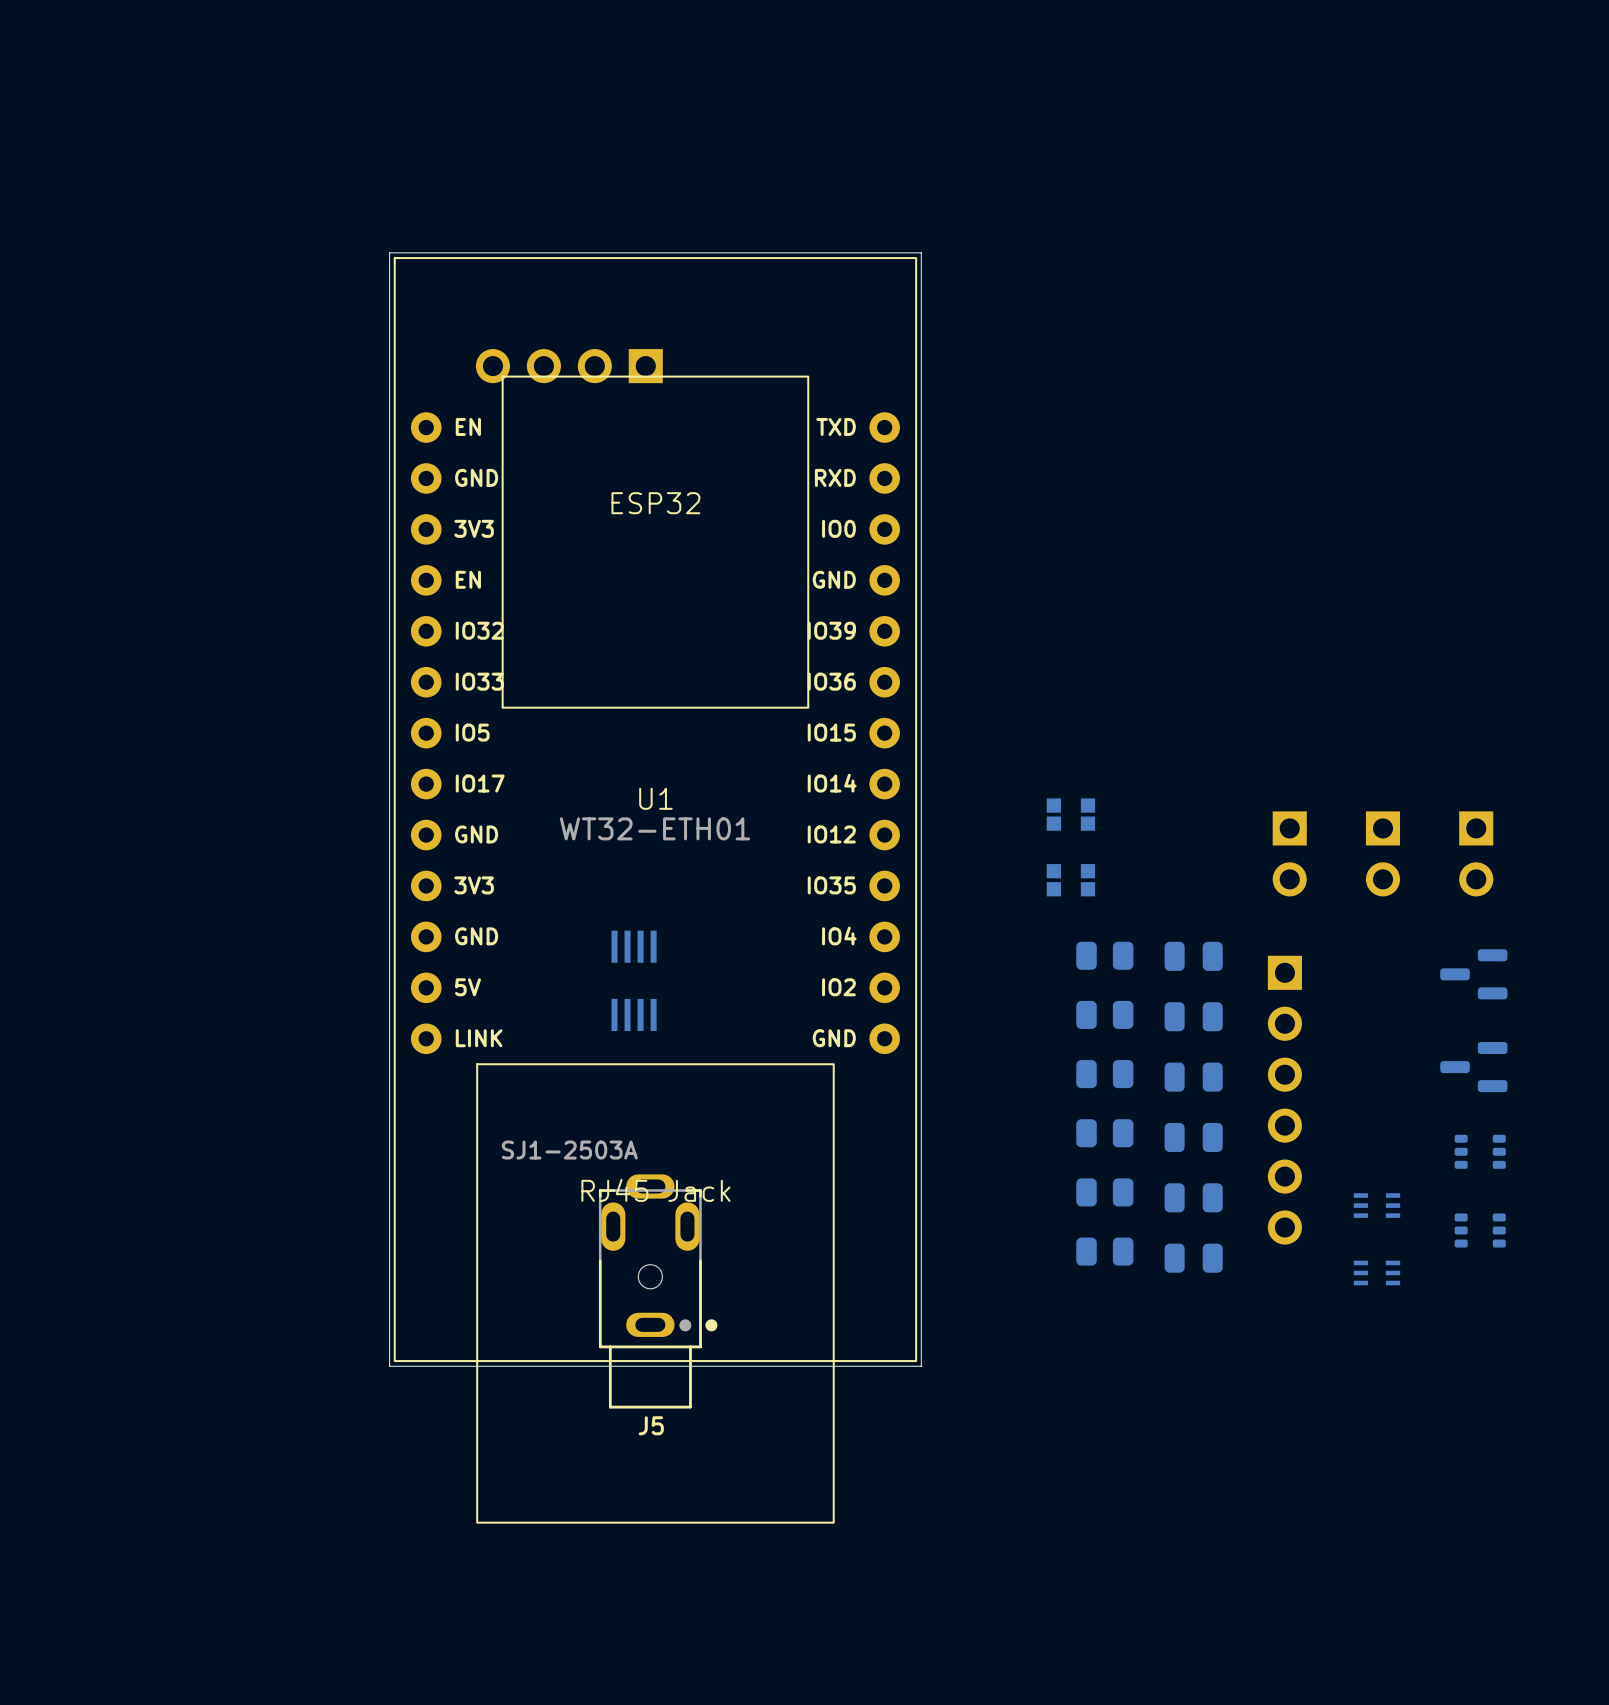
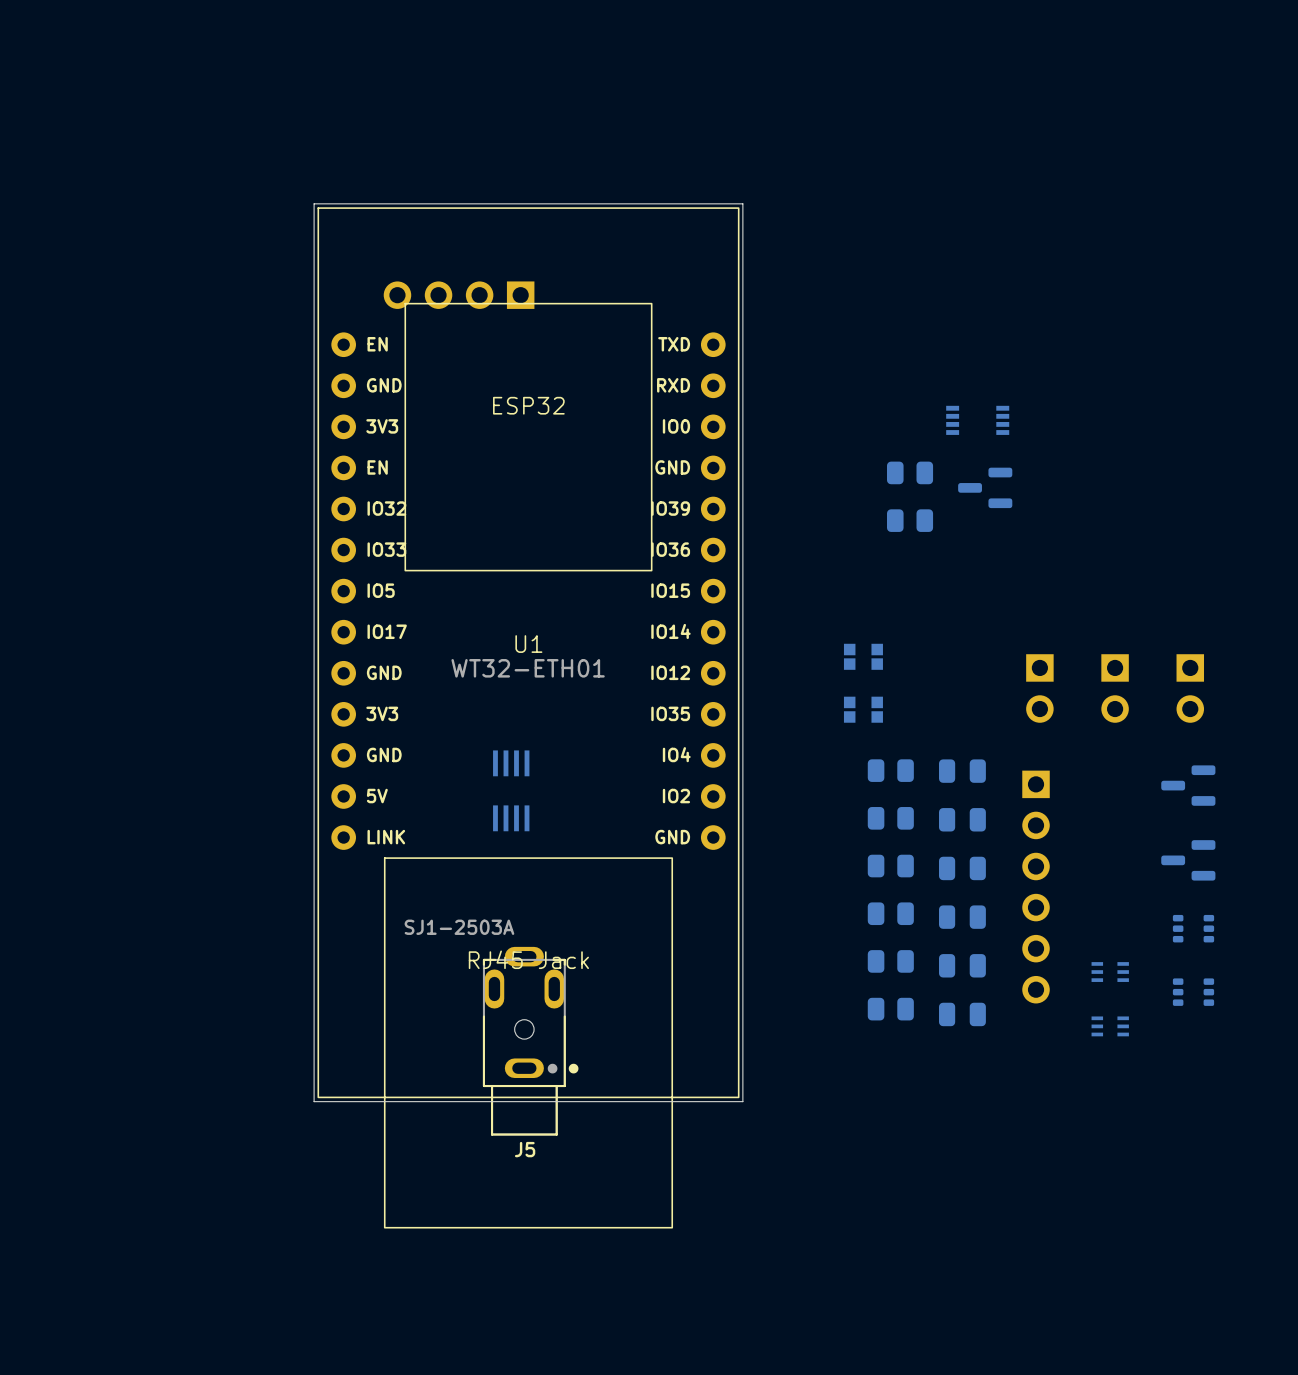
part: none -> (977, 420)
part: none -> (910, 472)
part: none -> (985, 487)
part: none -> (910, 520)

